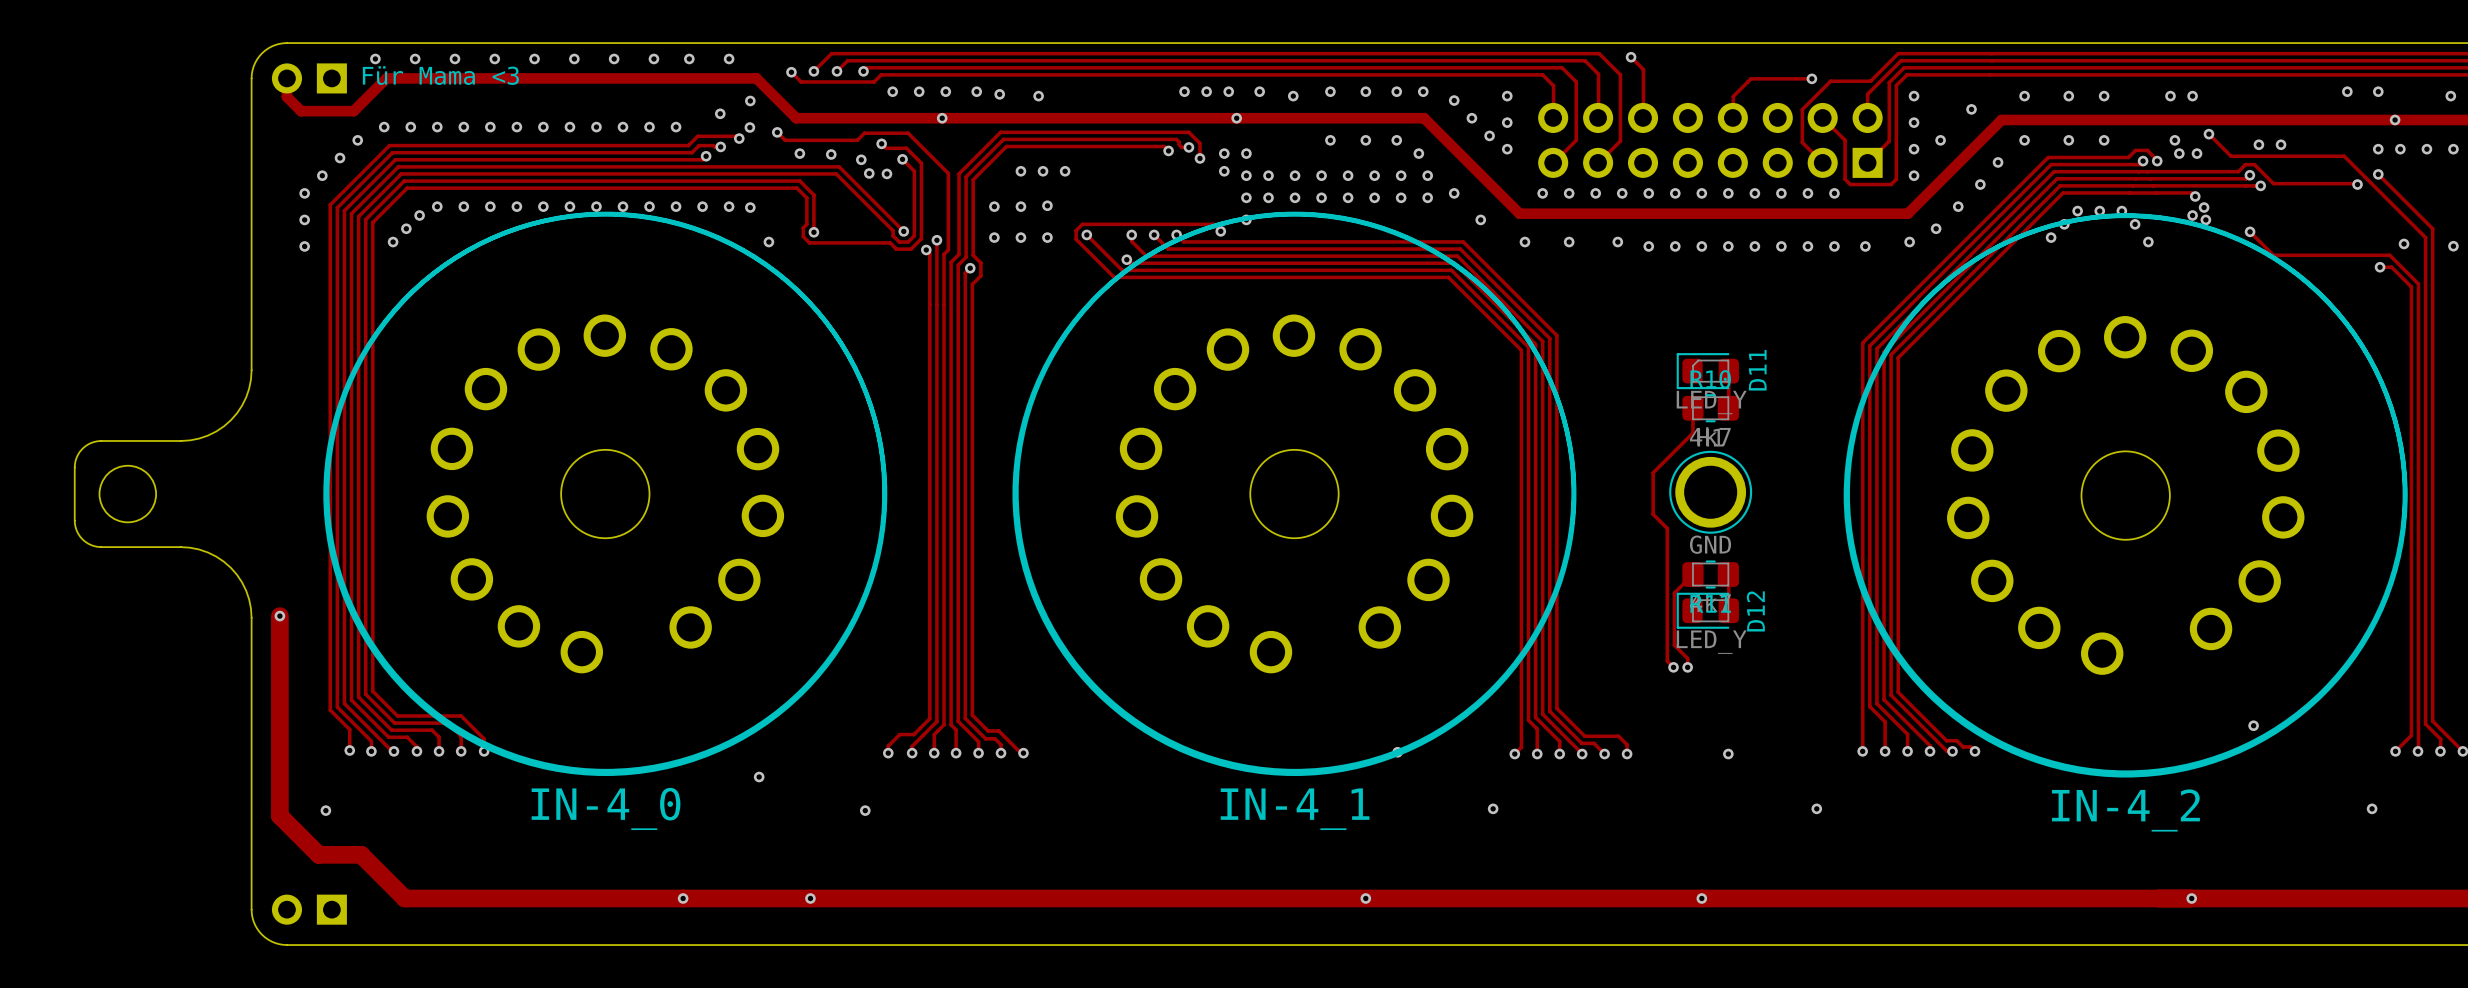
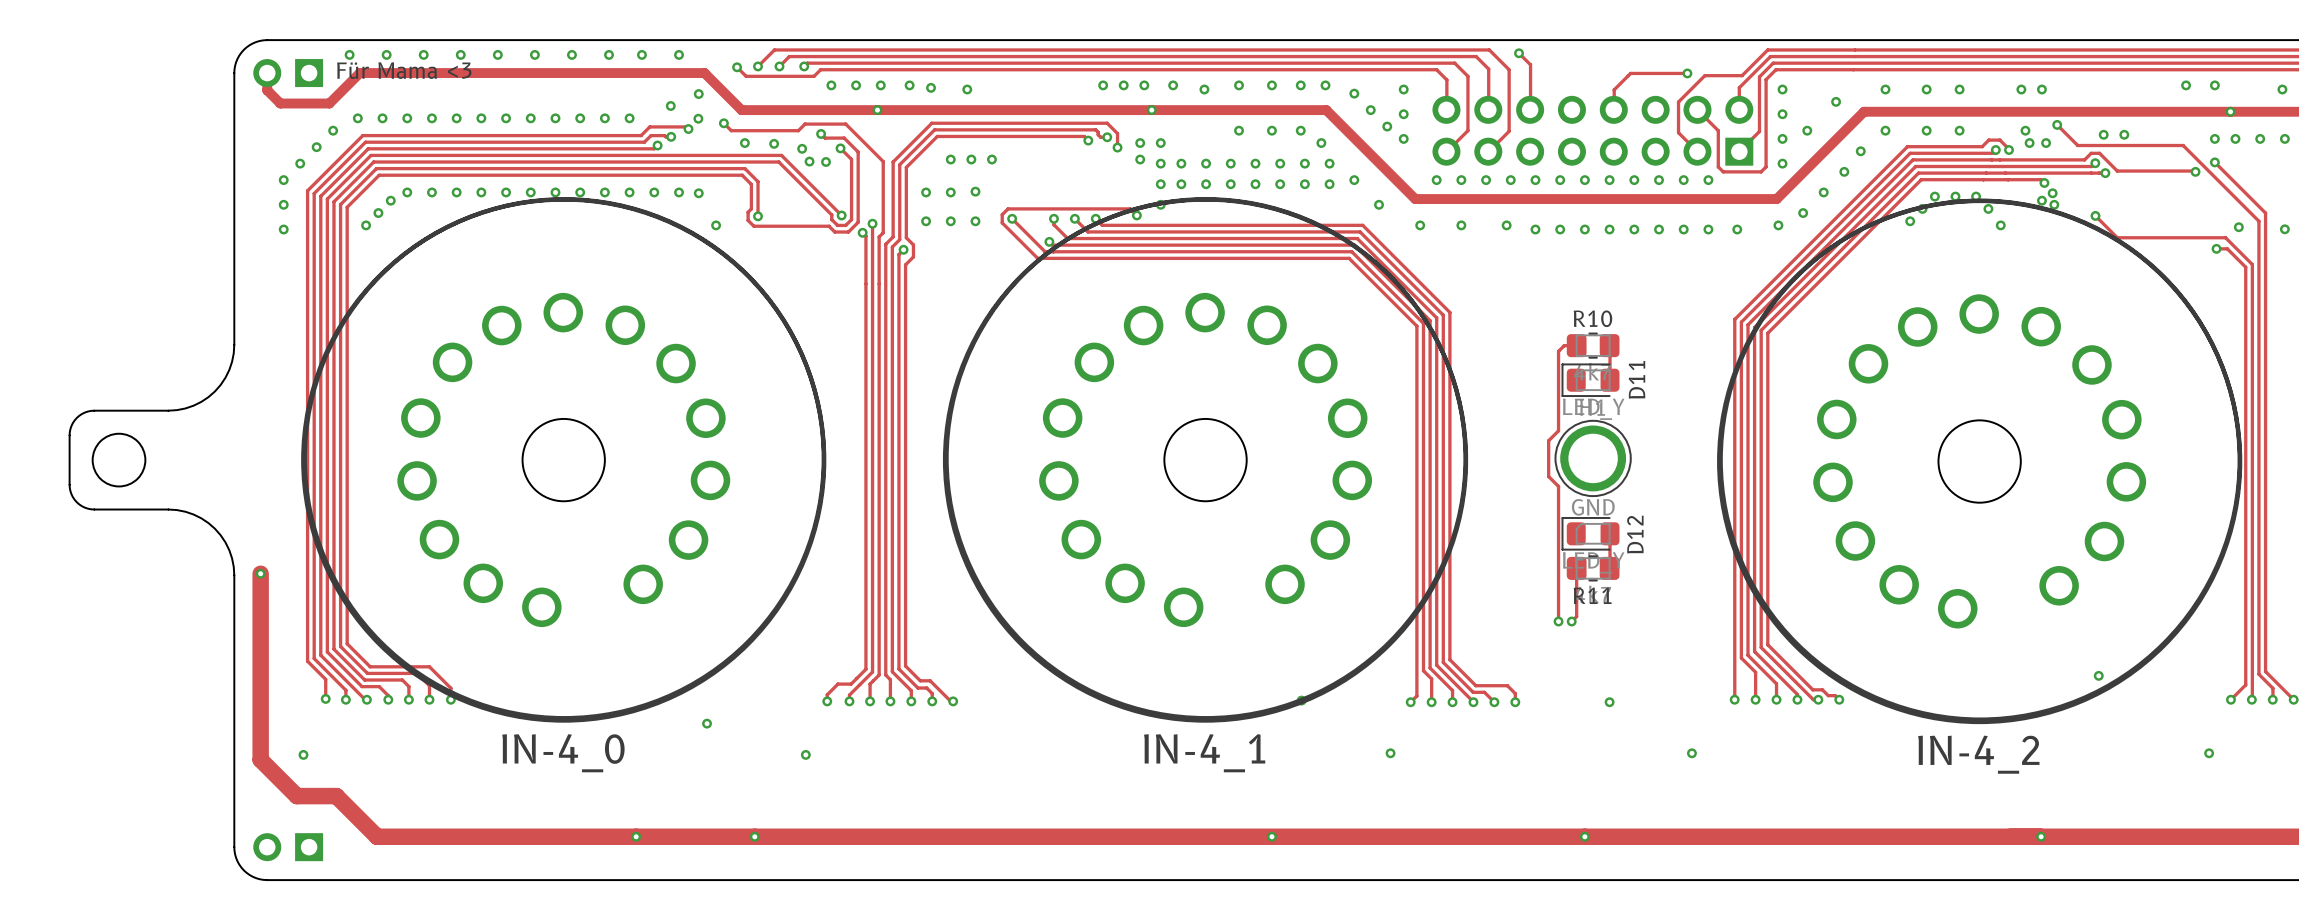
D11 position: (1707, 371) -> (1590, 380)
track: (1692, 408) (1692, 433) (1653, 472) (1653, 514) (1667, 528) (1667, 661) (1673, 667) -> (1576, 345) (1564, 345) (1558, 351) (1558, 430) (1548, 440) (1548, 476) (1558, 486) (1558, 621)
R10 position: (1710, 408) -> (1593, 345)
track: (1692, 574) (1674, 593) (1674, 645) (1687, 658) (1687, 667) -> (1576, 568) (1576, 616) (1571, 621)
R11 position: (1710, 574) -> (1593, 568)
D12 position: (1707, 610) -> (1590, 533)

